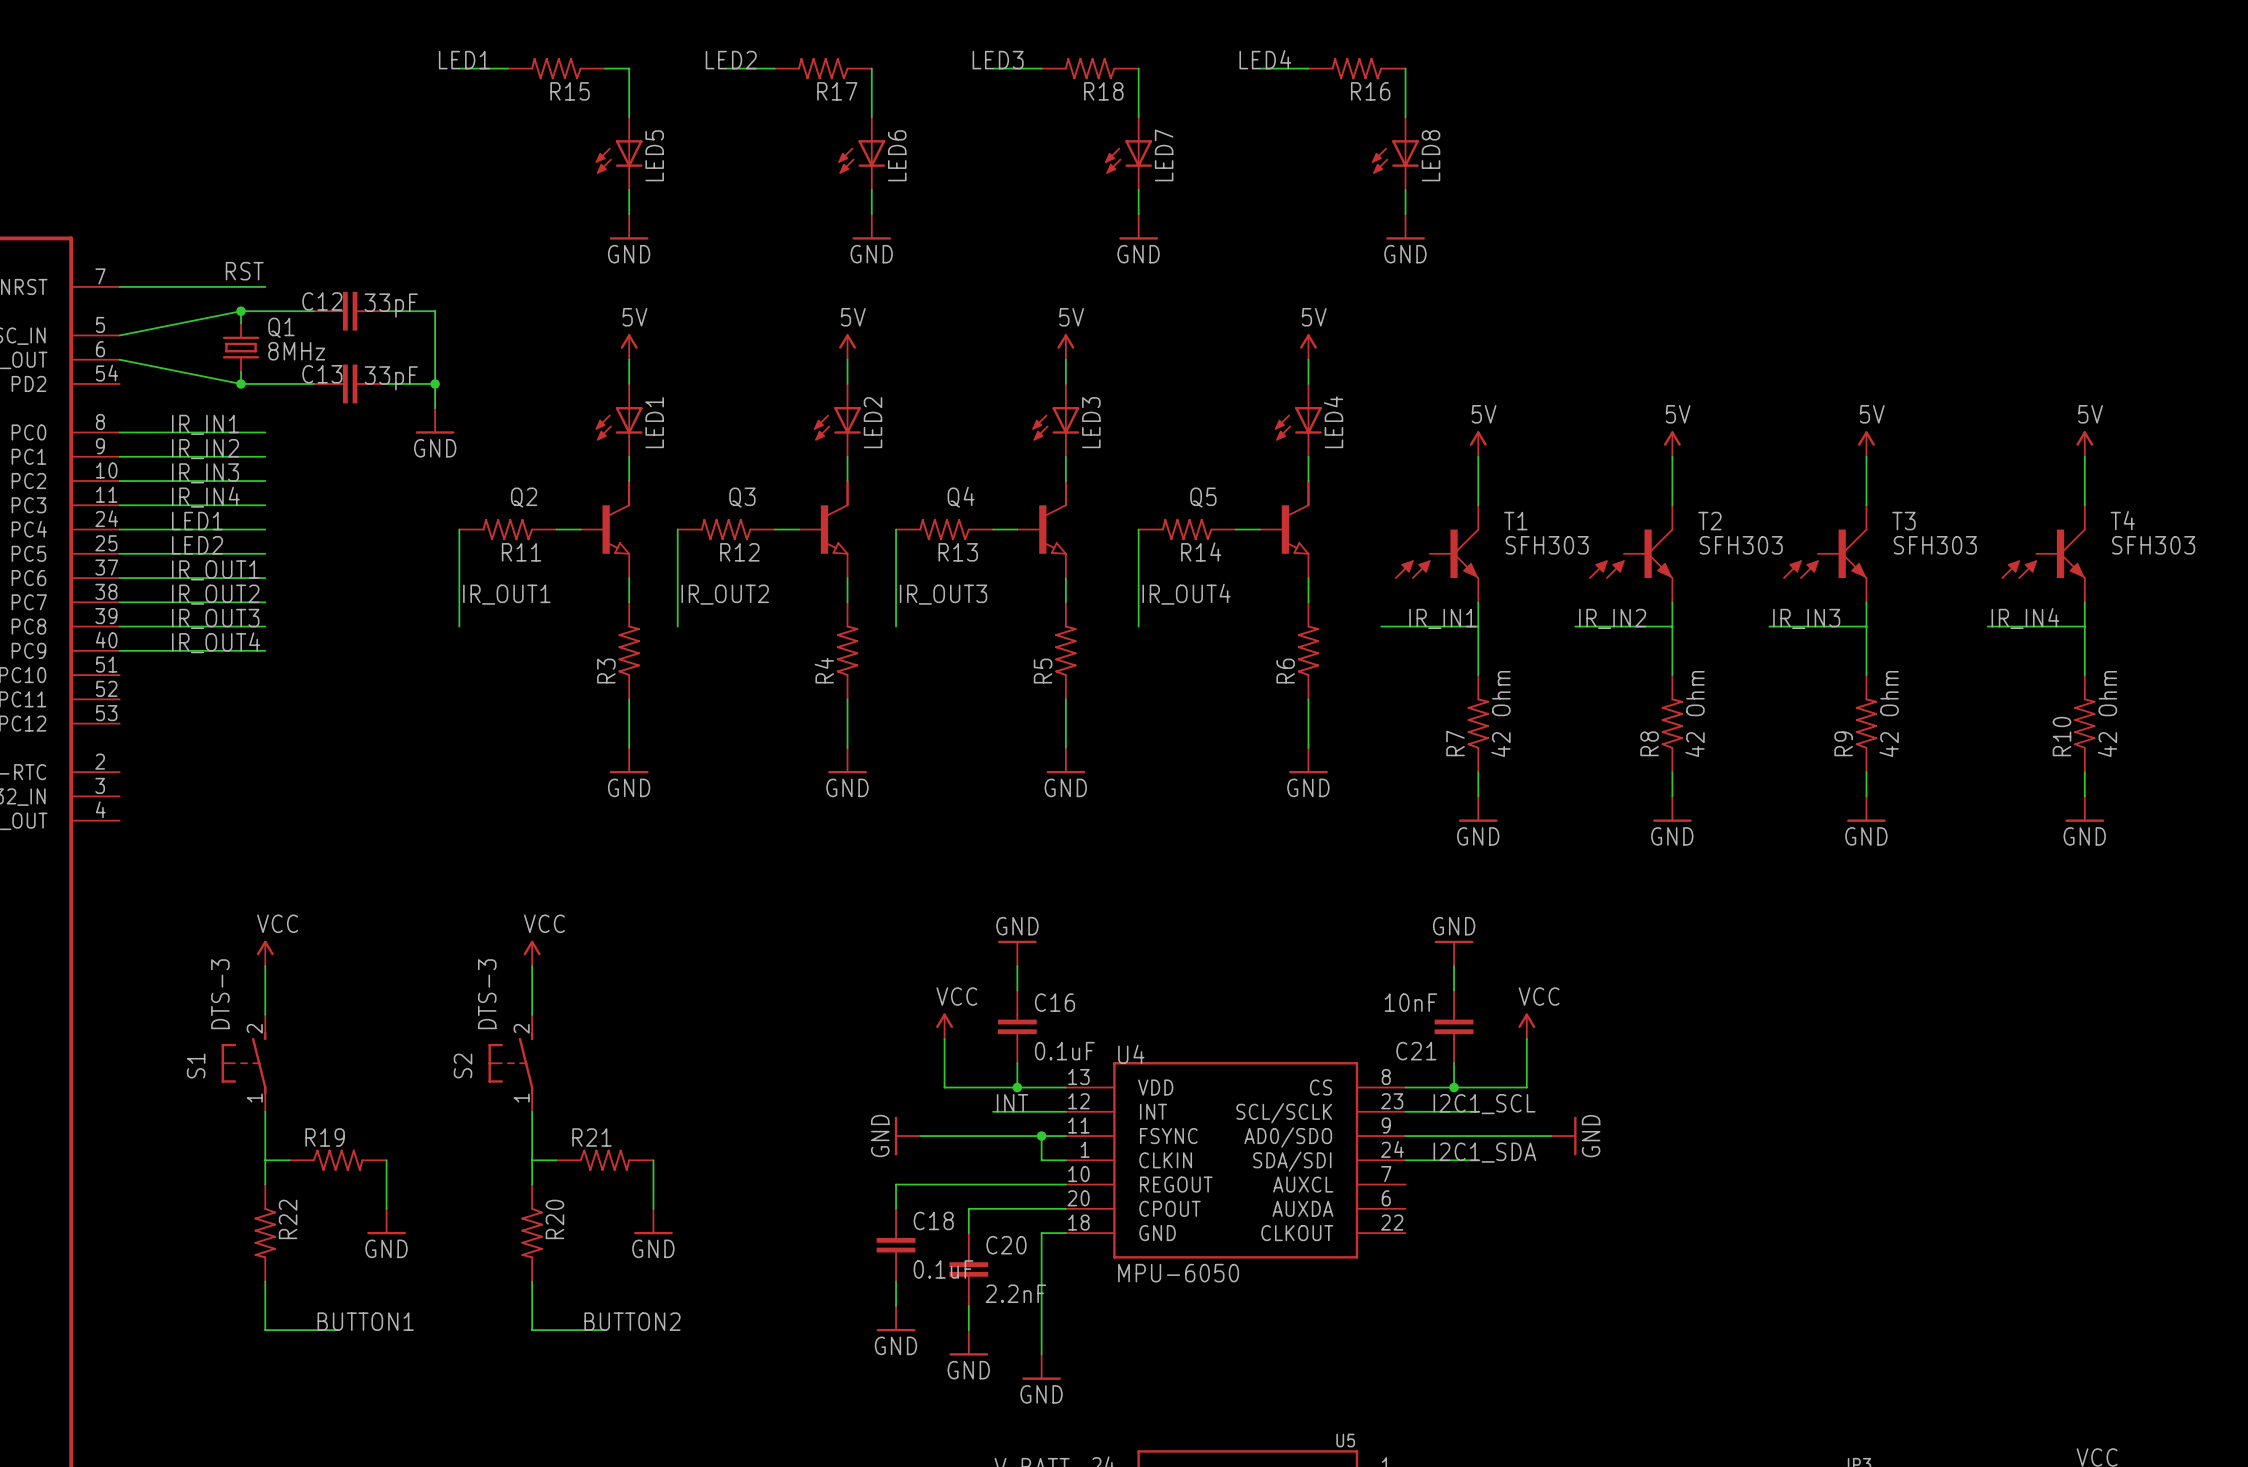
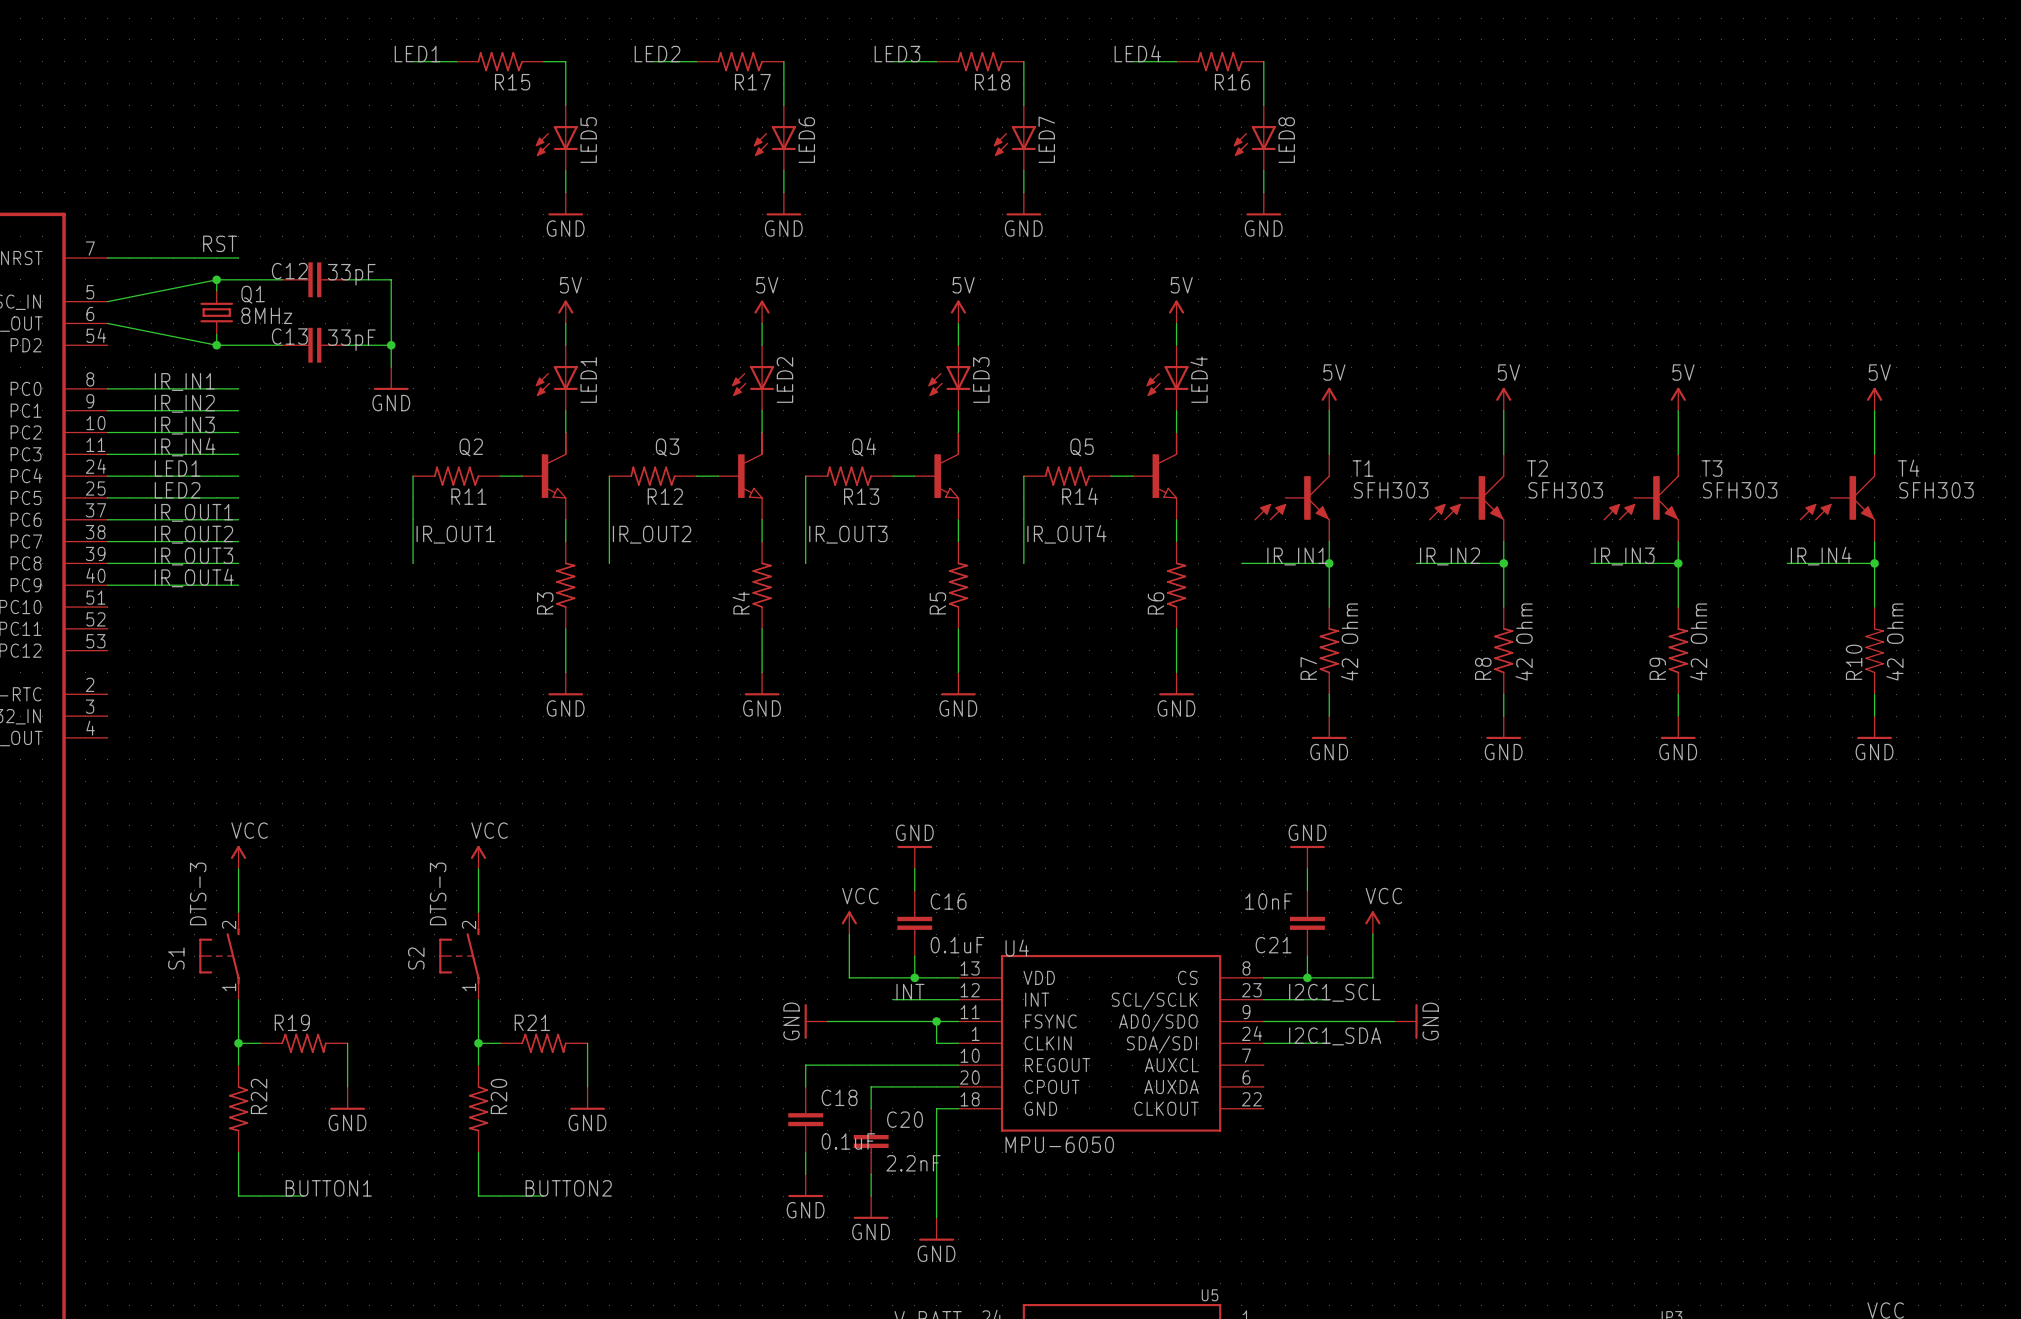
junction: none -> (1329, 563)
junction: none -> (1503, 563)
junction: none -> (1678, 563)
junction: none -> (1874, 563)
junction: none -> (238, 1043)
junction: none -> (478, 1043)

